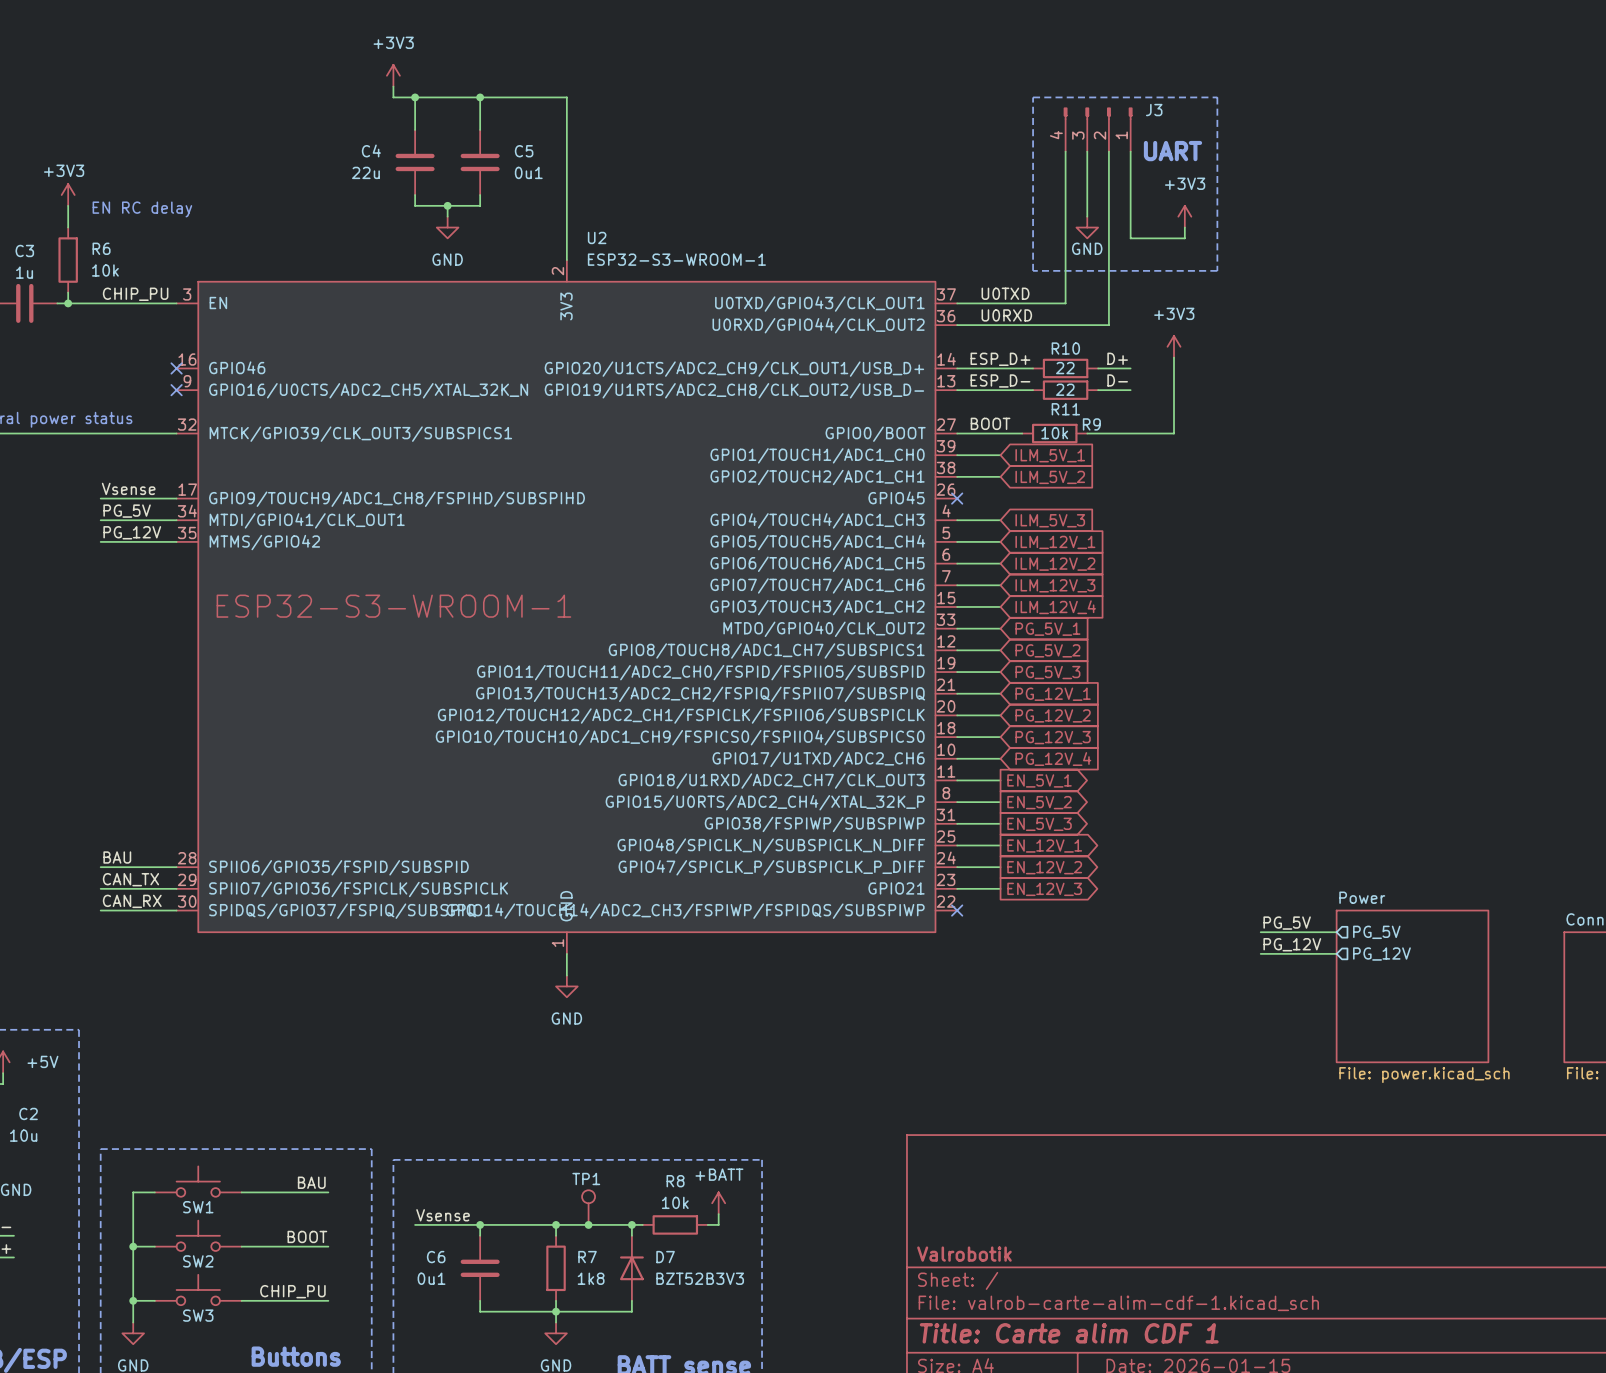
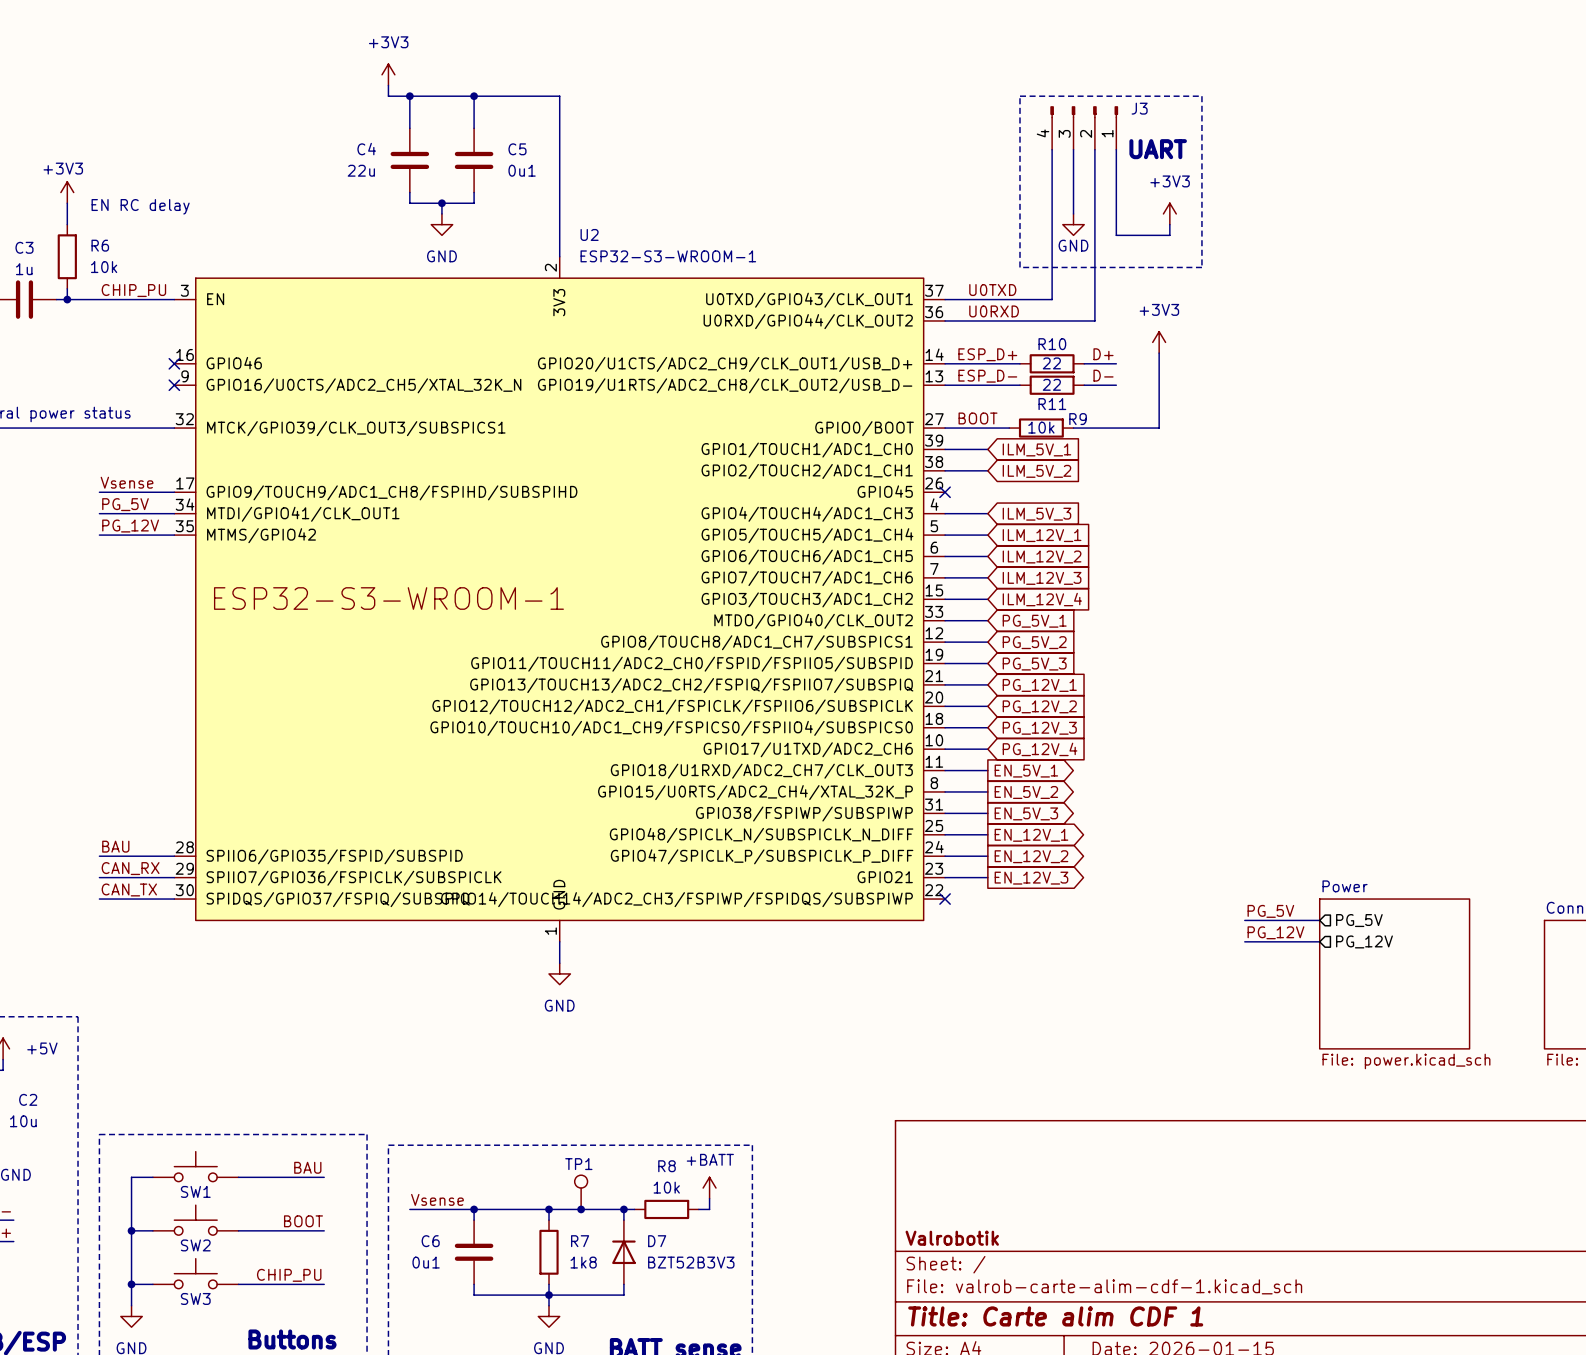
label: CAN_TX (130, 879) -> CAN_RX (130, 868)
label: CAN_RX (132, 901) -> CAN_TX (129, 889)

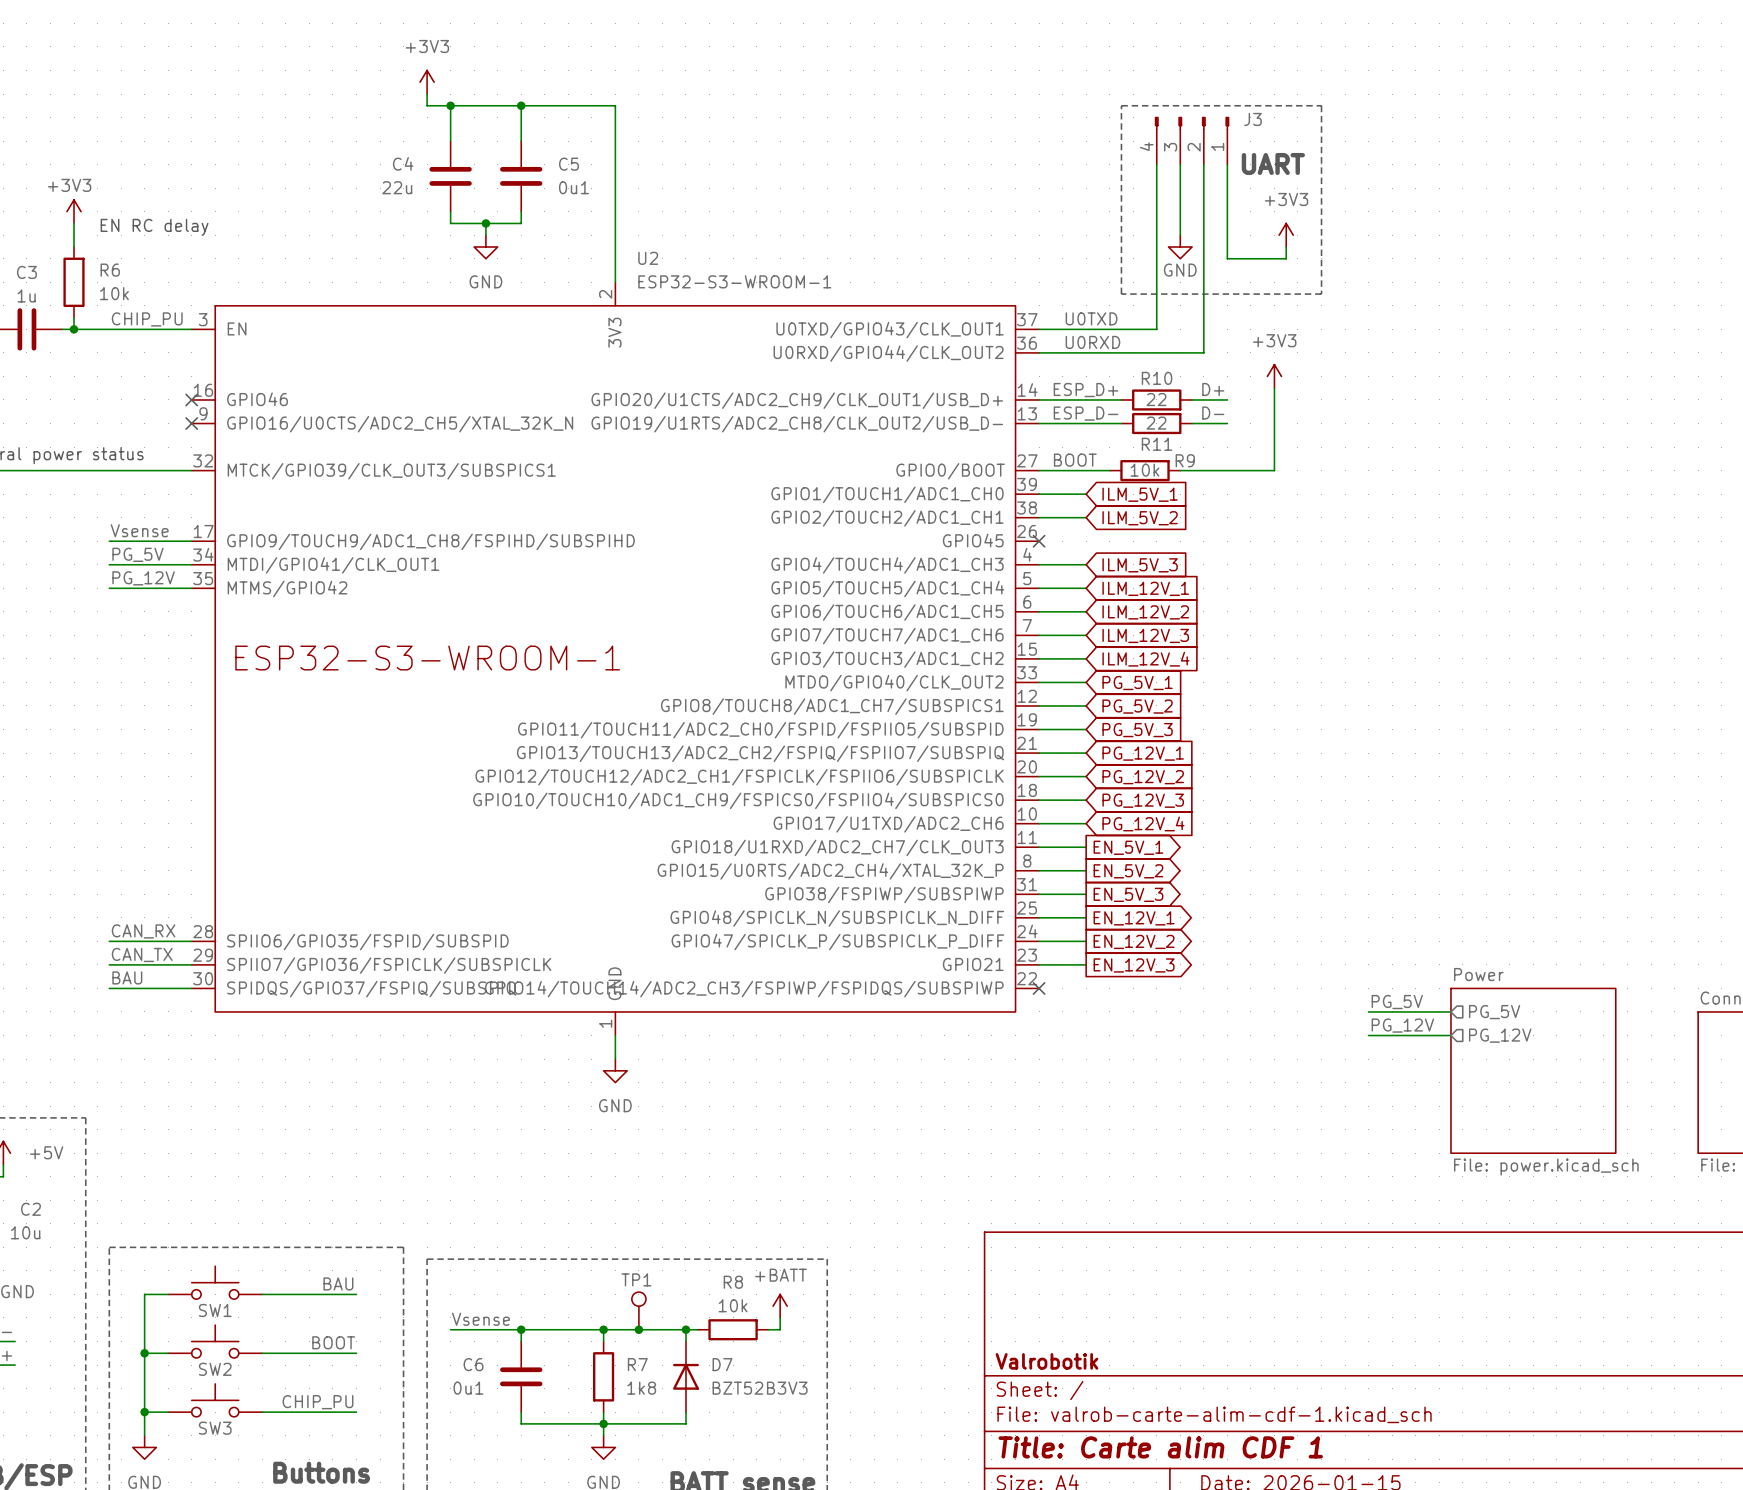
label: BAU (115, 846) -> CAN_RX (143, 931)
label: CAN_RX (130, 868) -> CAN_TX (142, 954)
label: CAN_TX (129, 889) -> BAU (127, 977)

